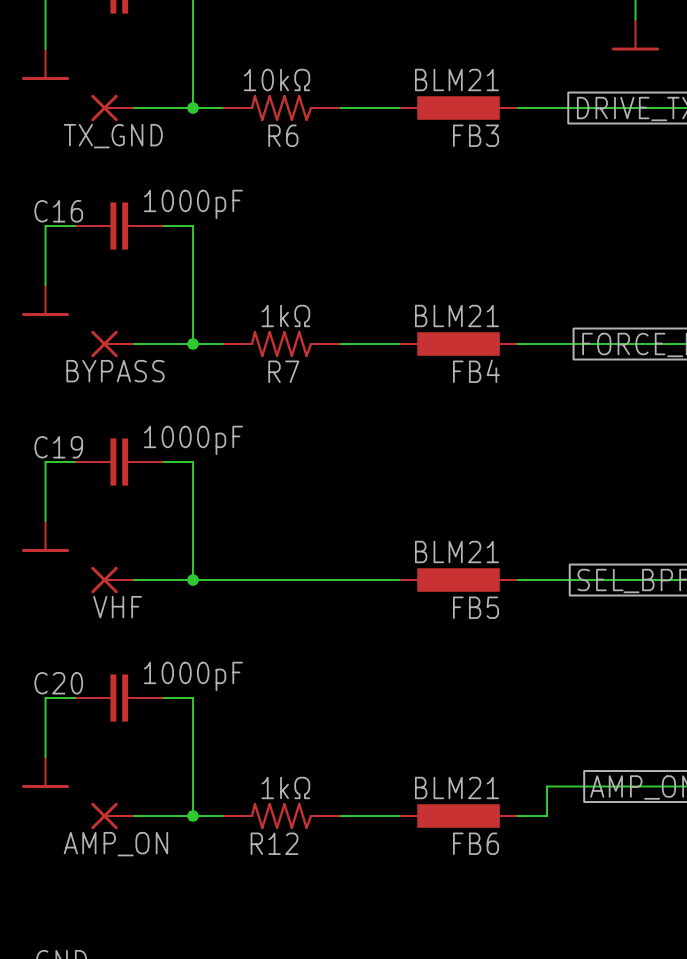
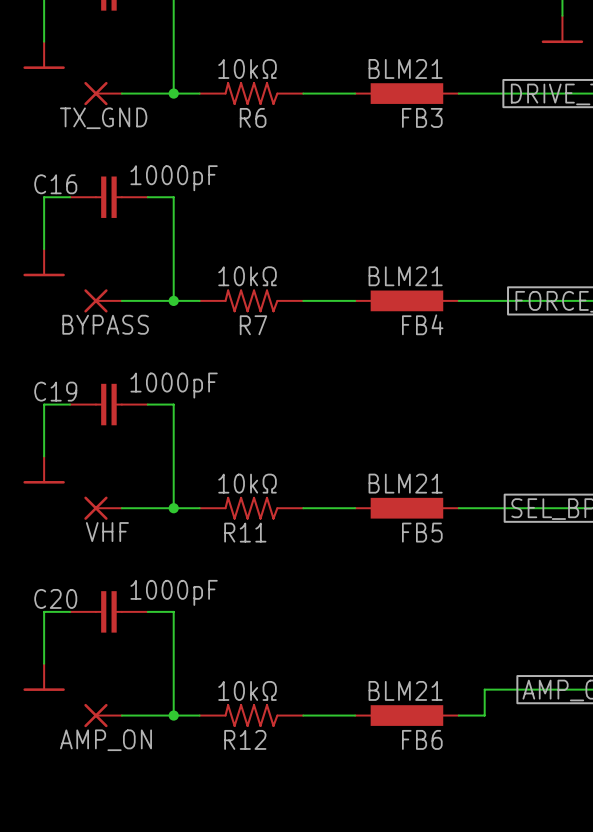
R7 value: 1kΩ (285, 315) -> 10kΩ (247, 276)
R11: none -> 10kΩ (251, 508)
R12 value: 1kΩ (285, 787) -> 10kΩ (247, 690)

